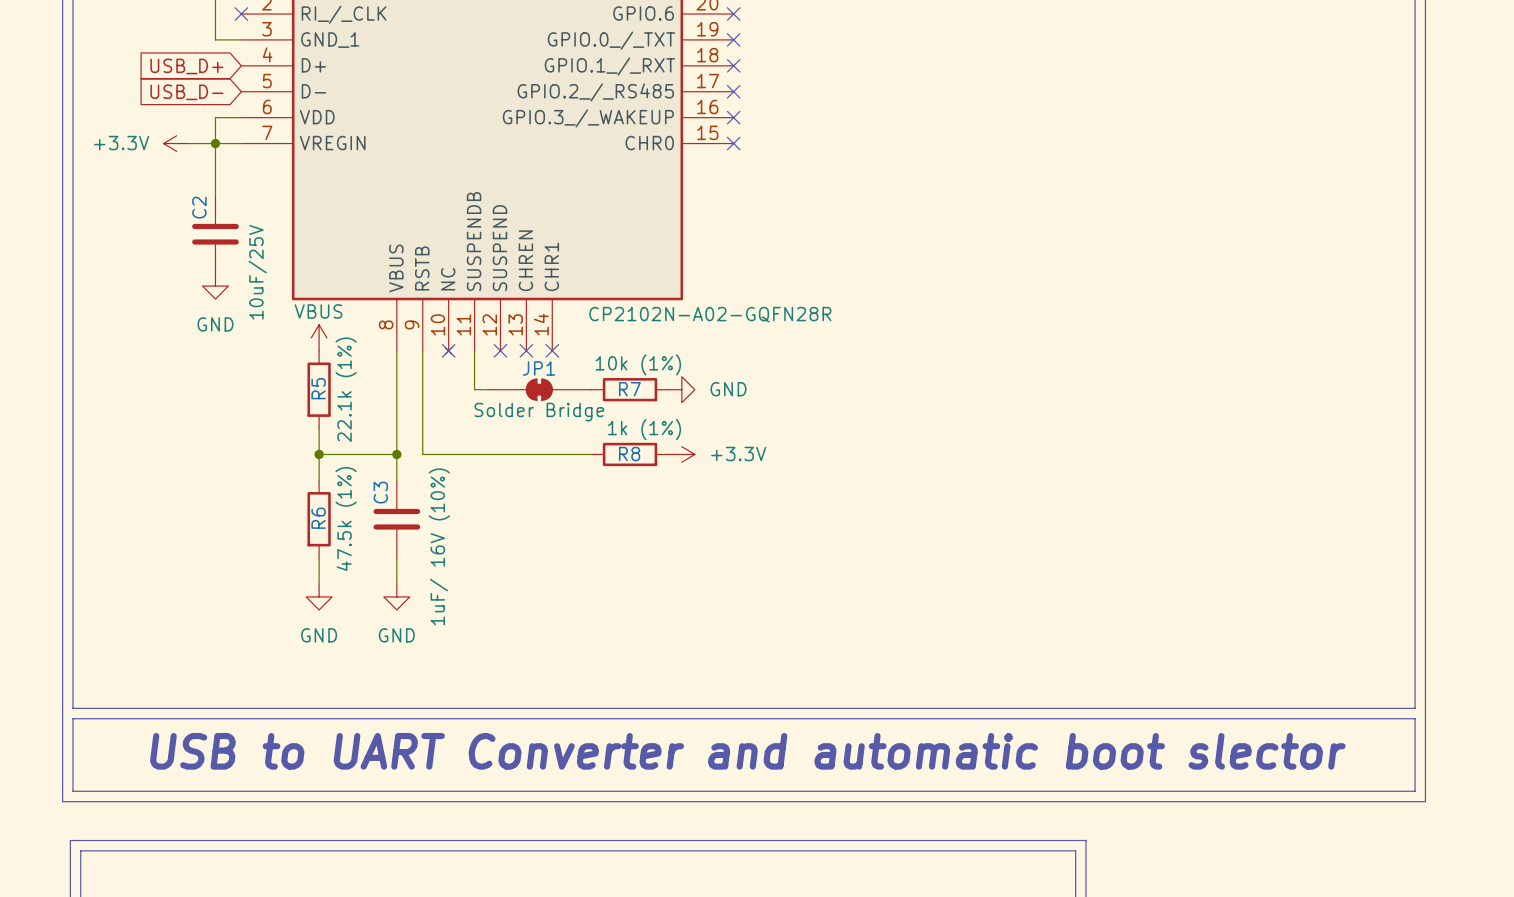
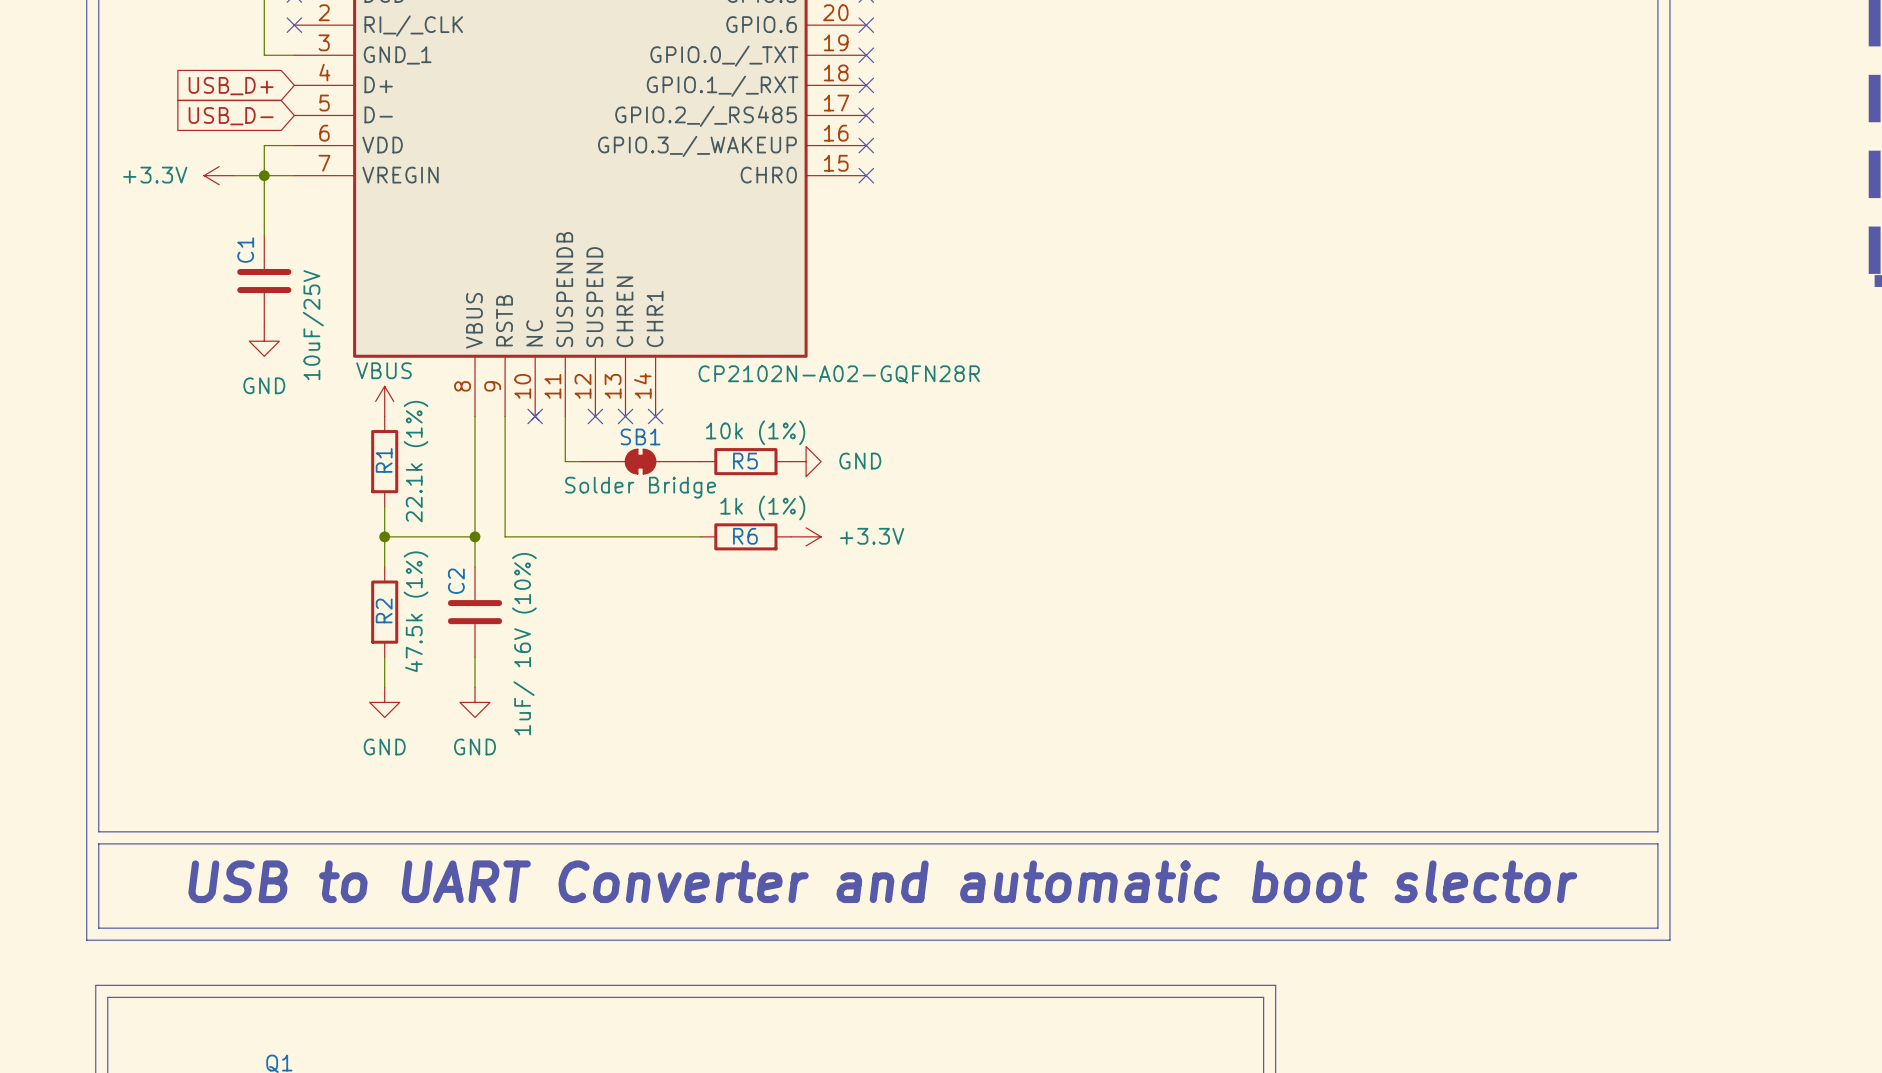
C2 name: C2 (199, 207) -> C1 (245, 250)
JP1 name: JP1 (539, 368) -> SB1 (640, 436)
R5 name: R5 (318, 388) -> R1 (384, 460)
R7 name: R7 (629, 389) -> R5 (745, 461)
R8 name: R8 (629, 453) -> R6 (745, 536)
C3 name: C3 (380, 492) -> C2 (456, 581)
R6 name: R6 (318, 518) -> R2 (384, 610)

